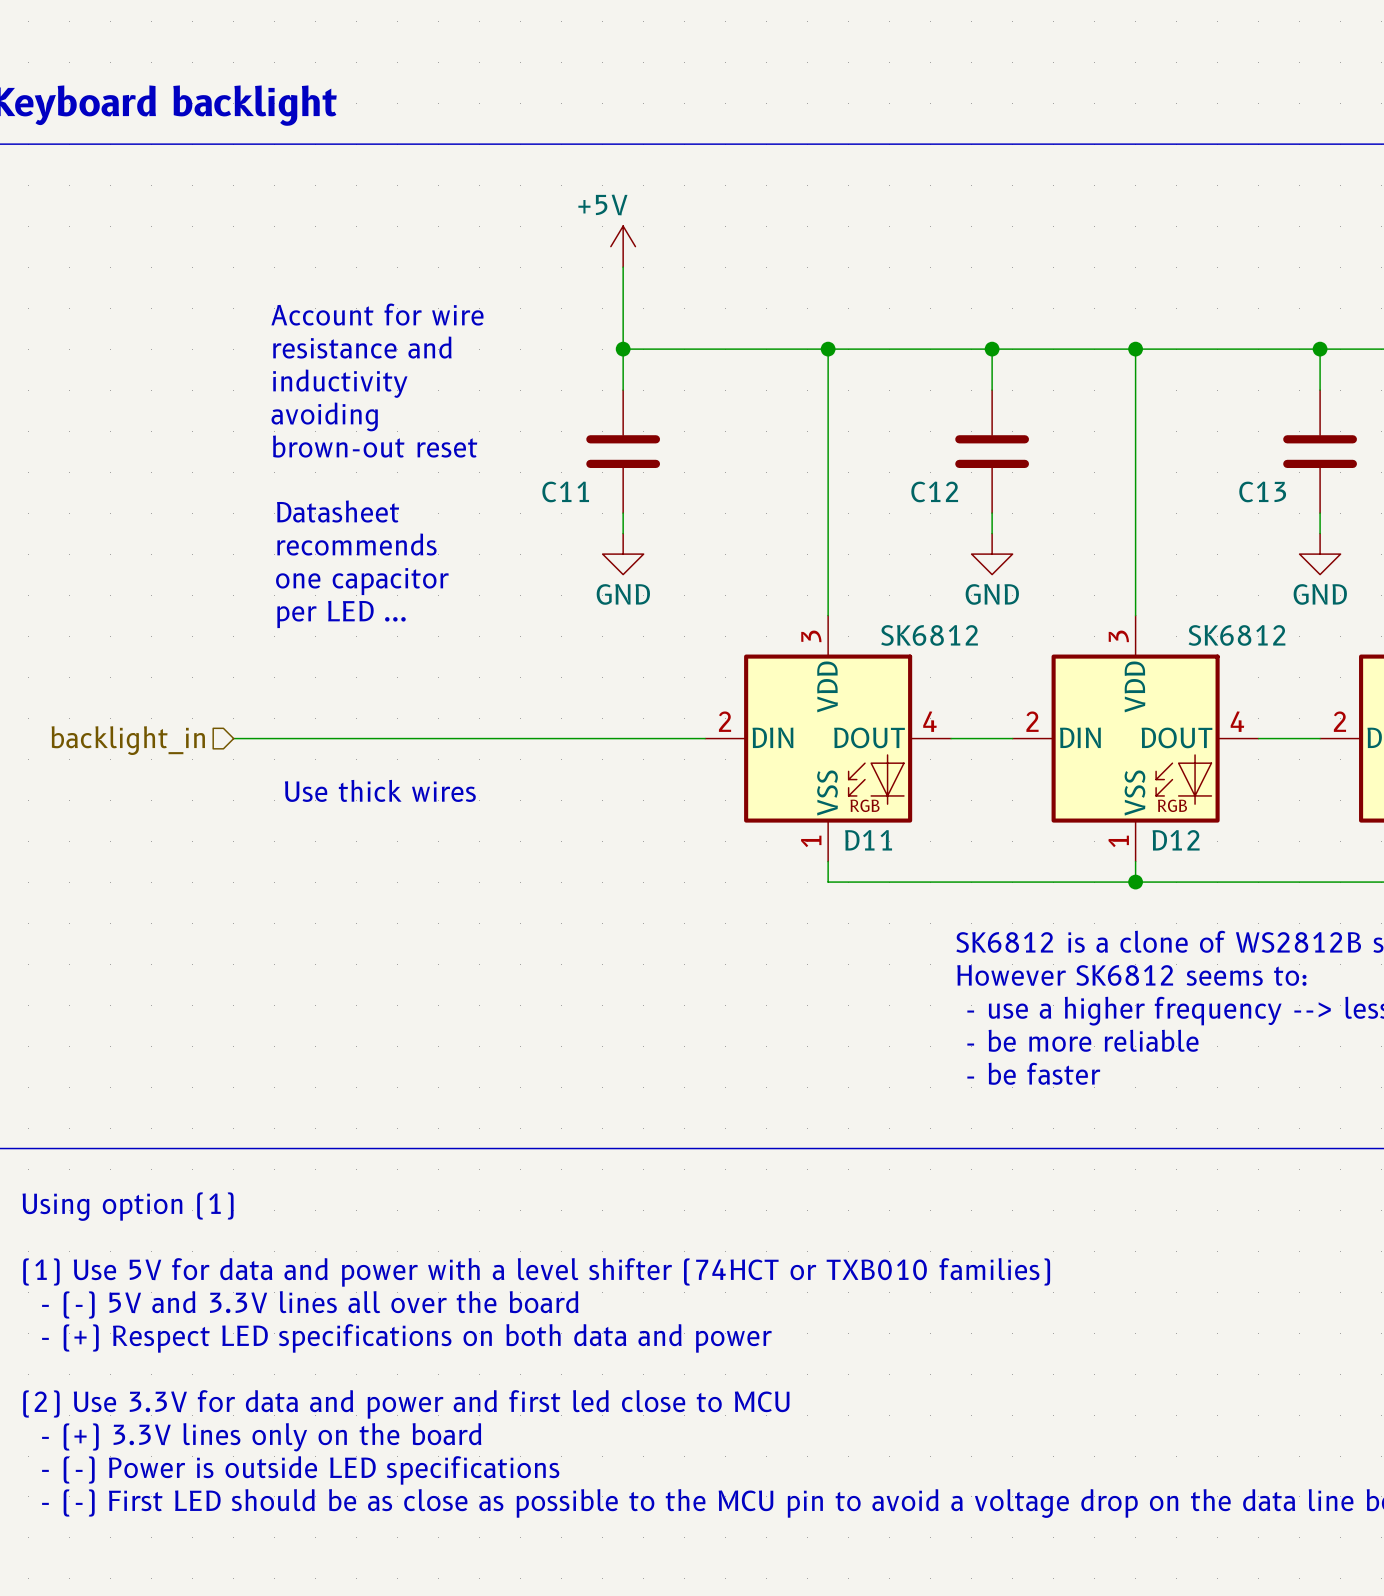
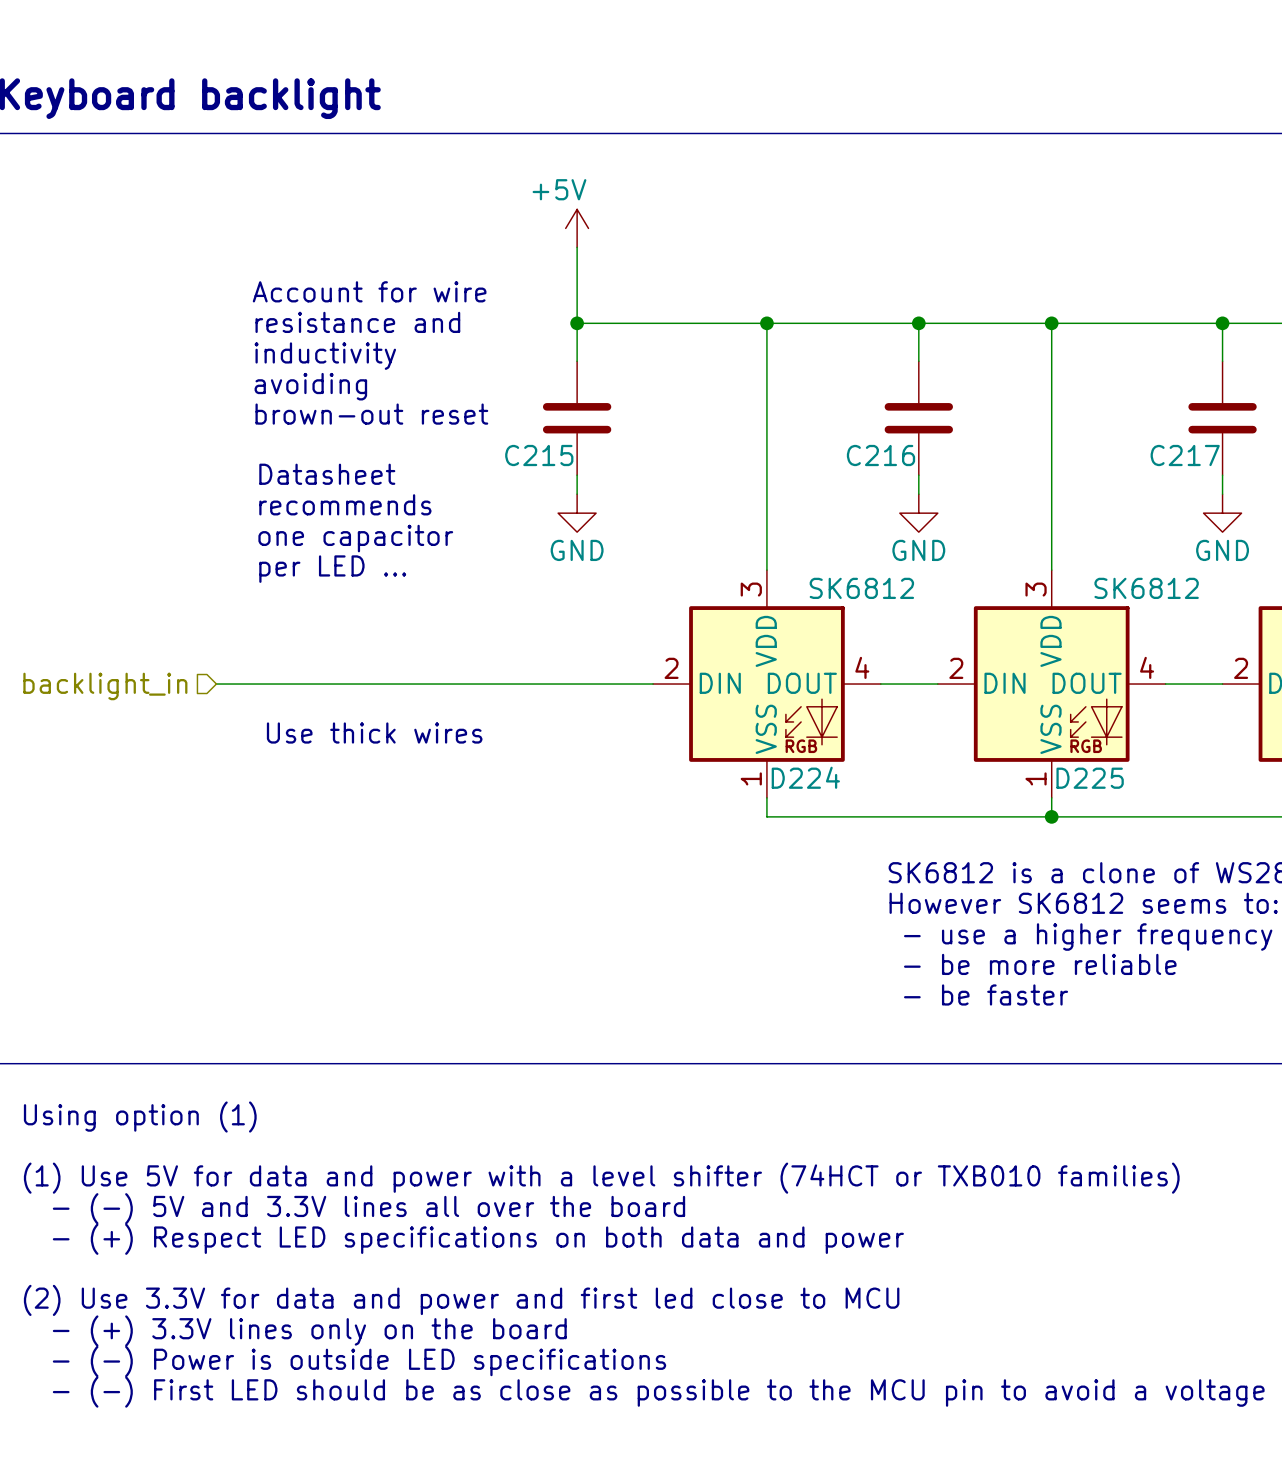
C11 name: C11 (565, 491) -> C215 (539, 455)
C12 name: C12 (934, 491) -> C216 (880, 455)
C13 name: C13 (1262, 491) -> C217 (1185, 455)
D11 name: D11 (868, 840) -> D224 (805, 777)
D12 name: D12 (1176, 840) -> D225 (1090, 778)

